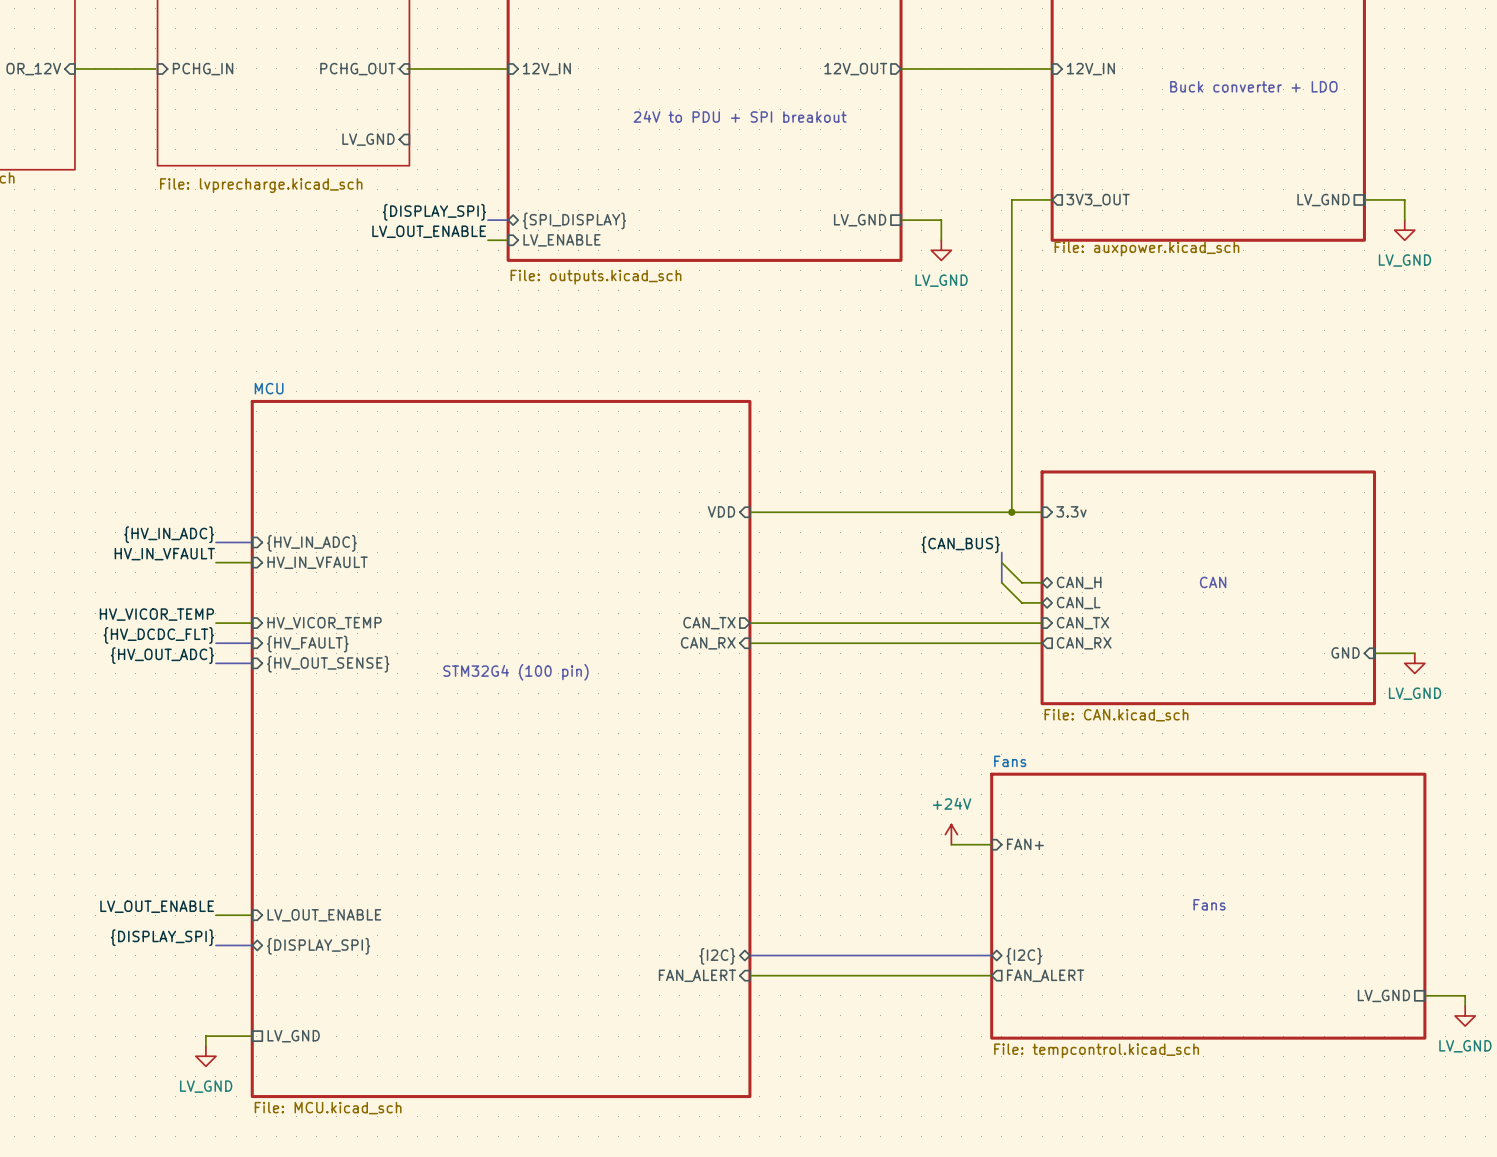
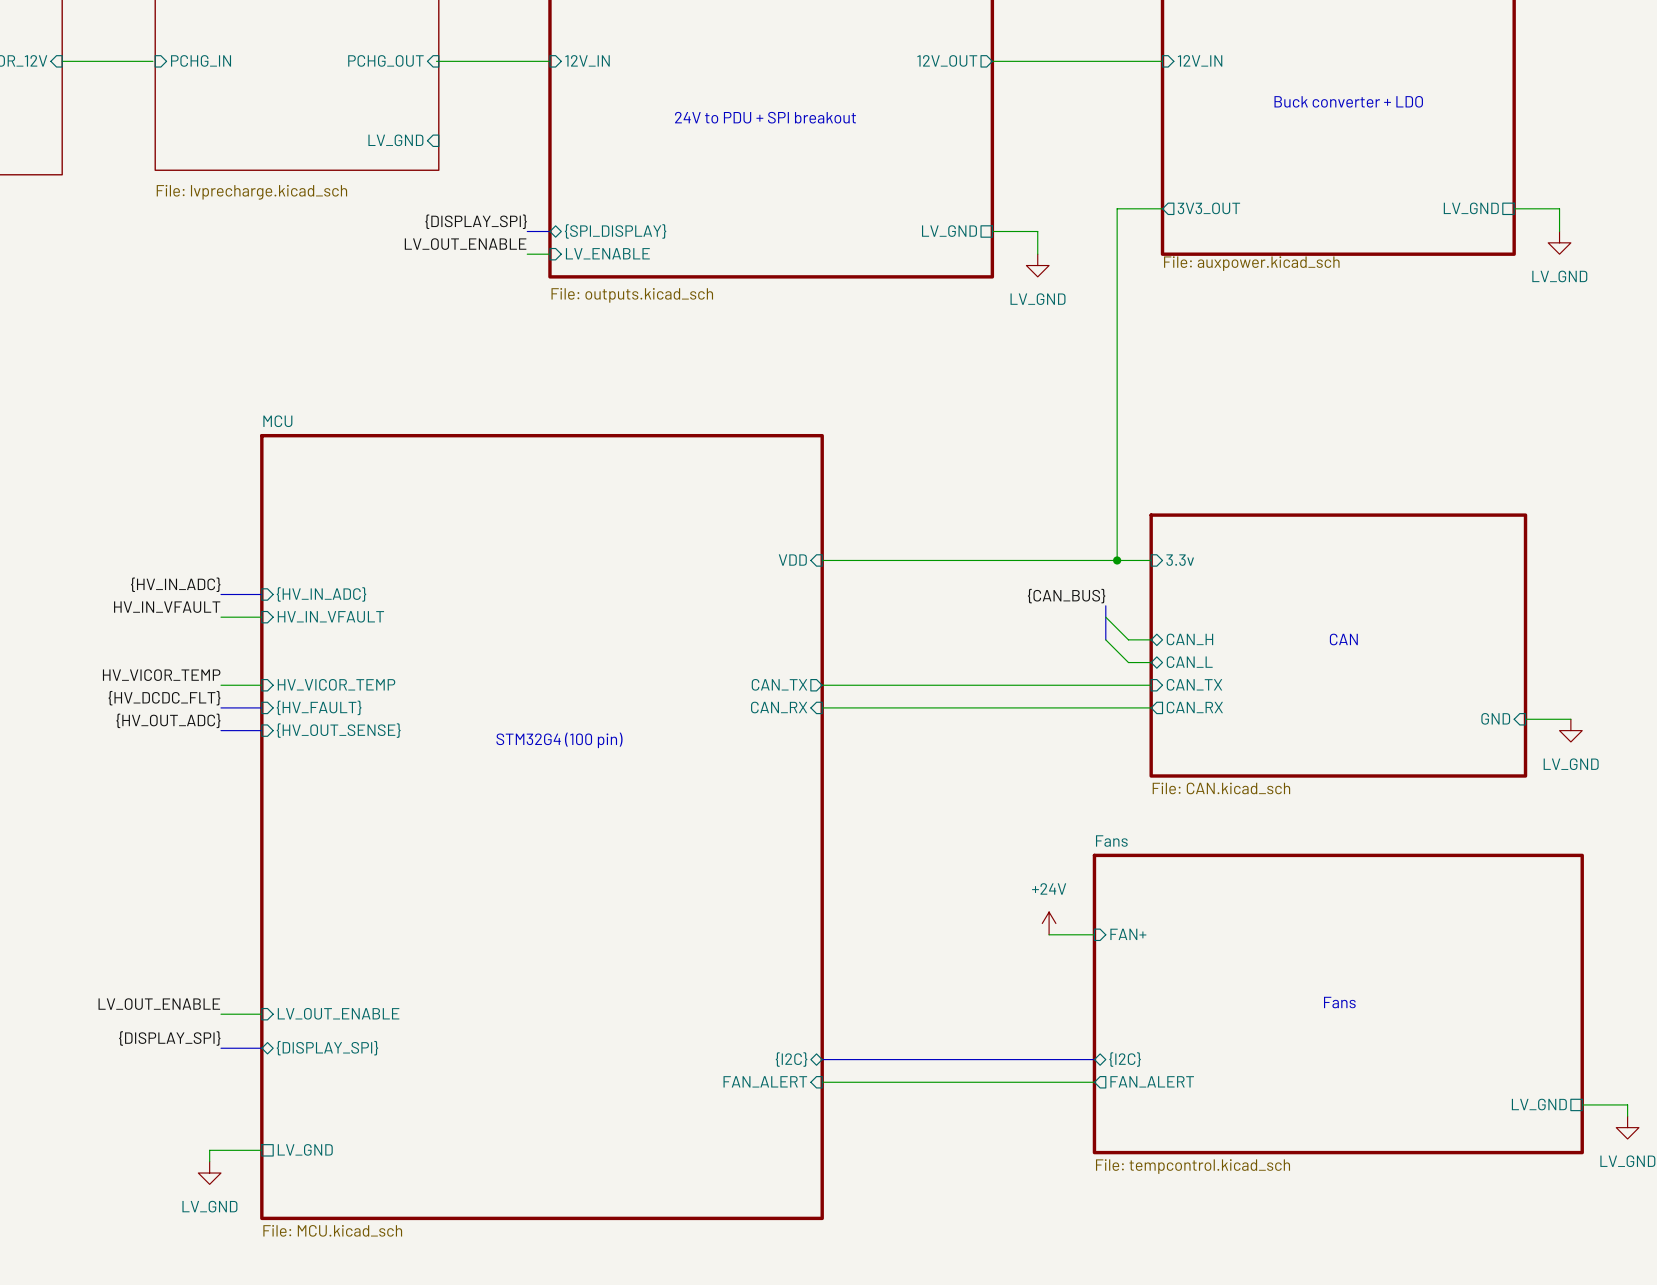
text position: Buck converter + LDO (1253, 86) -> Buck converter + LDO (1348, 101)
text position: 24V to PDU + SPI breakout (740, 116) -> 24V to PDU + SPI breakout (765, 117)

